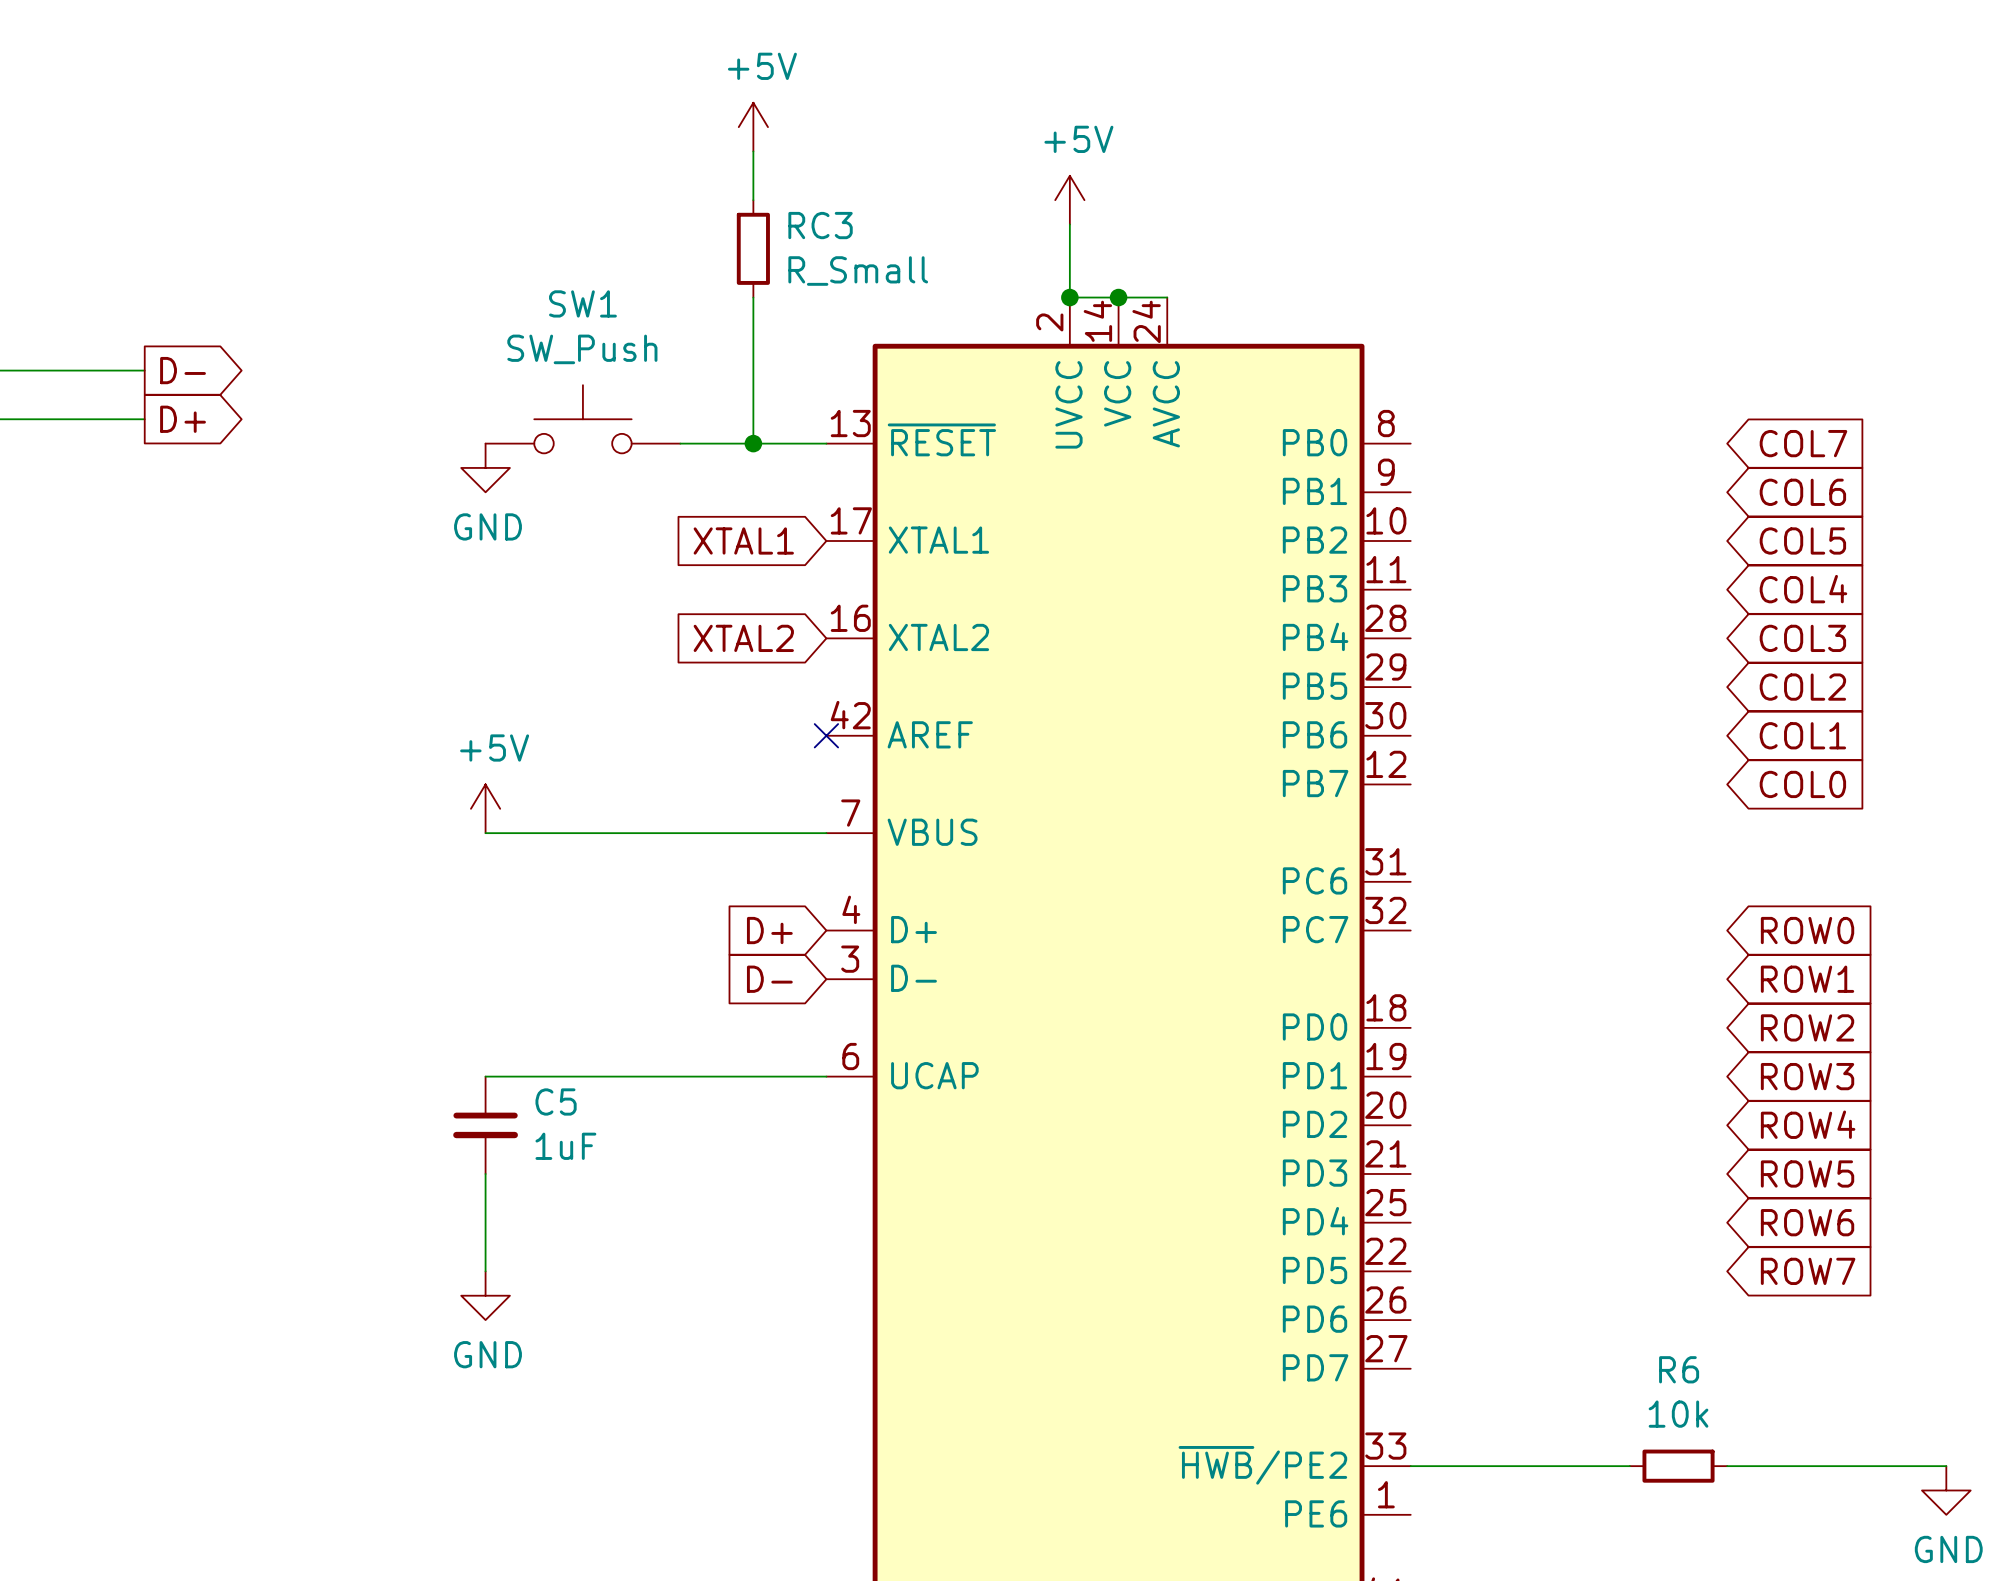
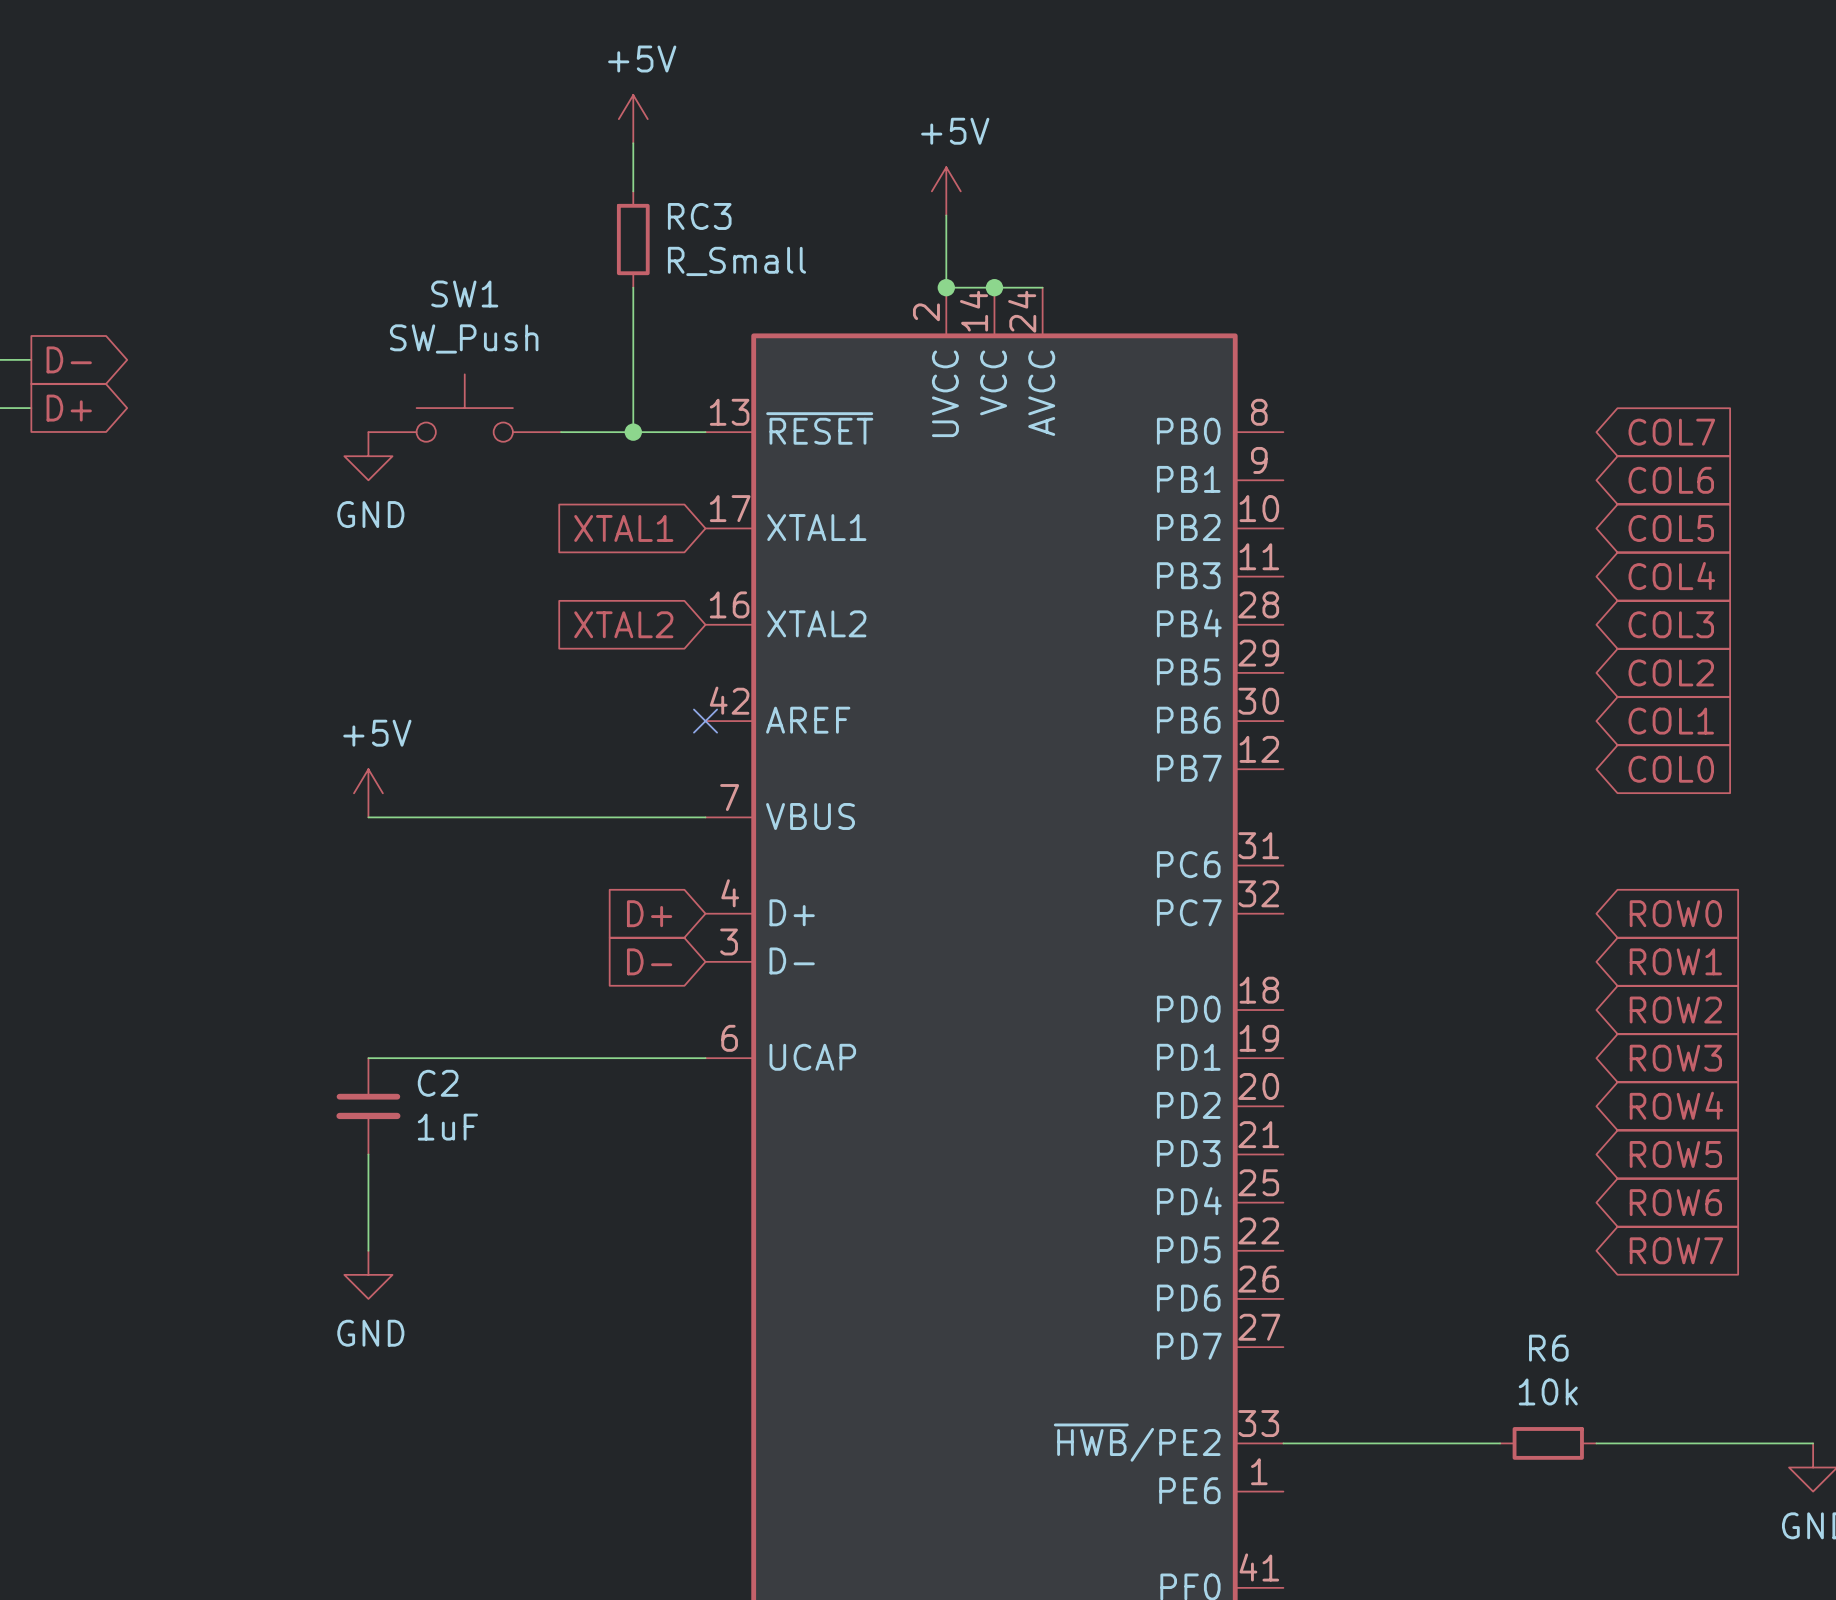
C5 name: C5 (556, 1101) -> C2 (438, 1083)

